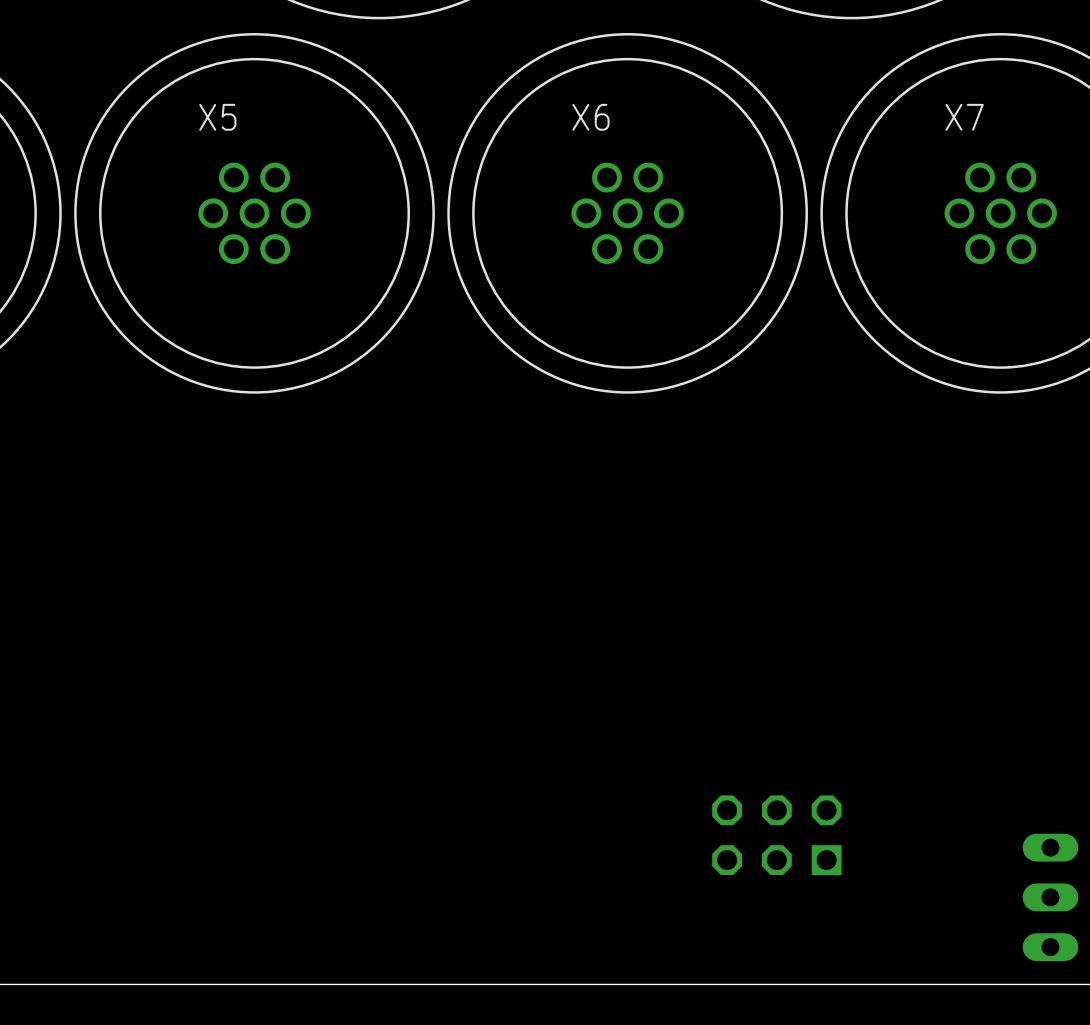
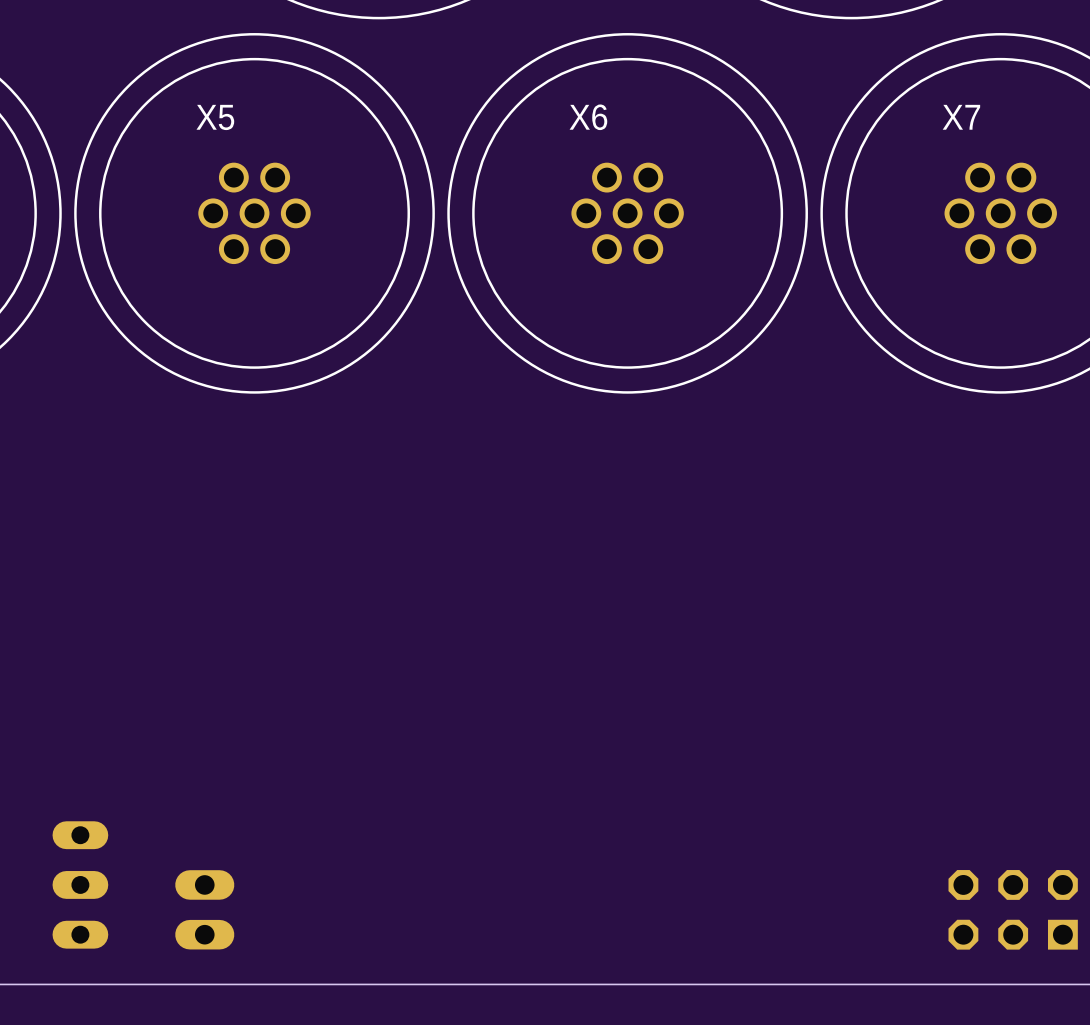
part position: (776, 835) -> (1013, 909)
part: none -> (80, 884)
part: (1050, 897) -> none
part: none -> (204, 909)

